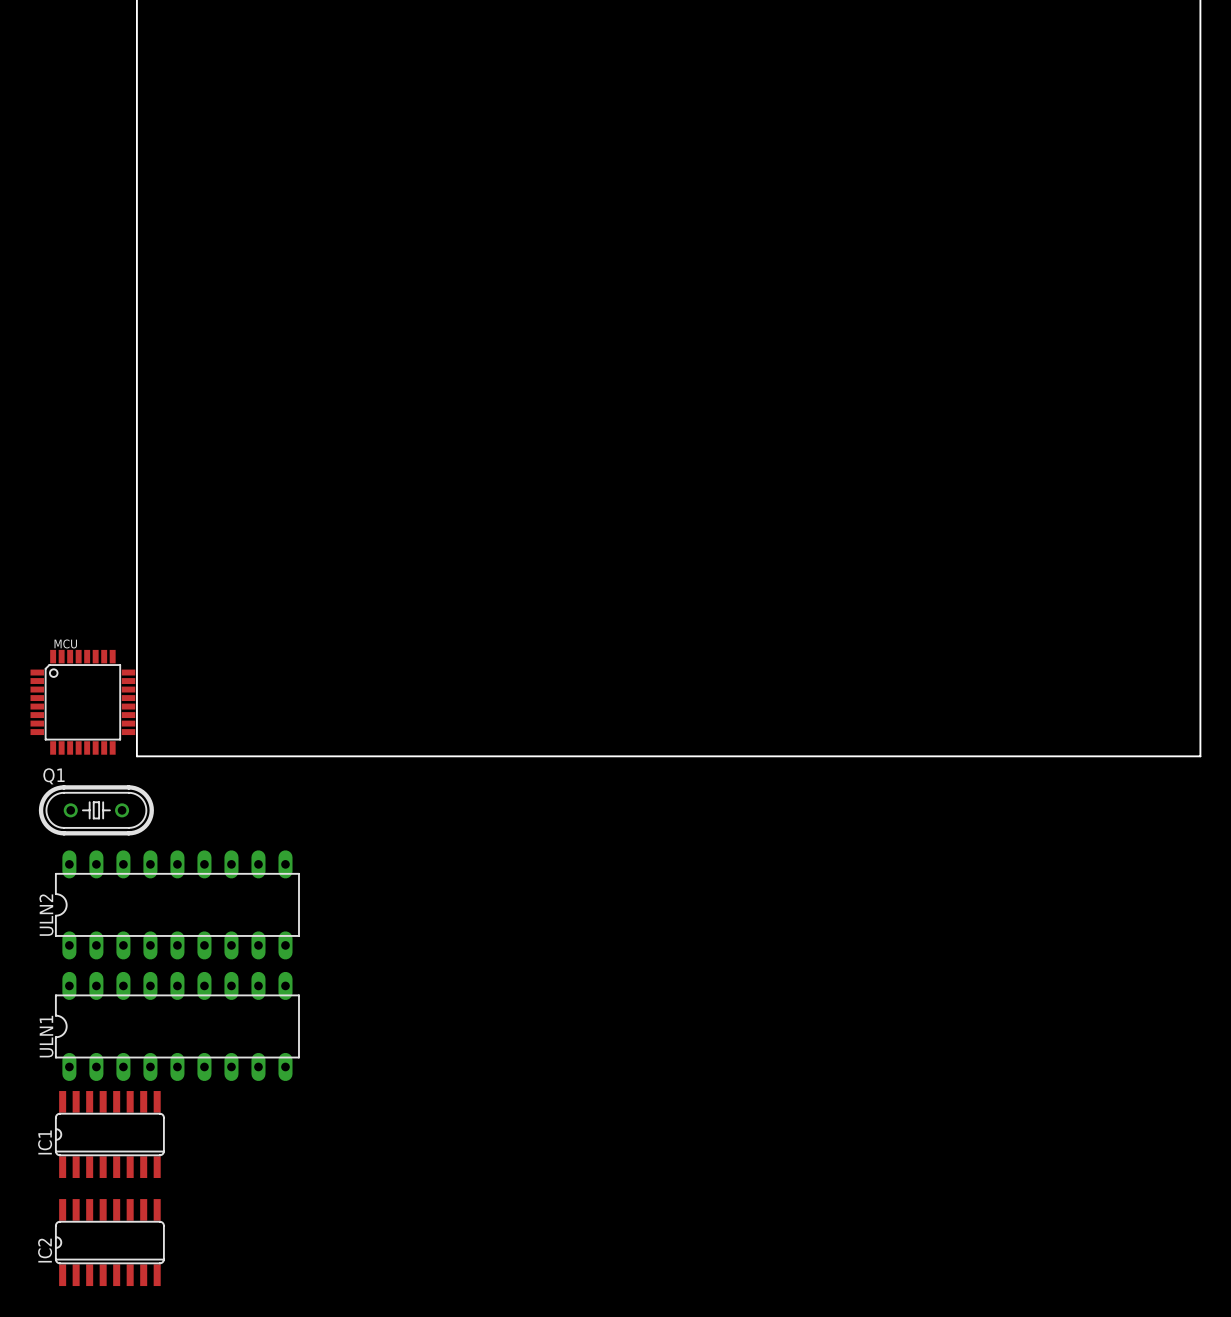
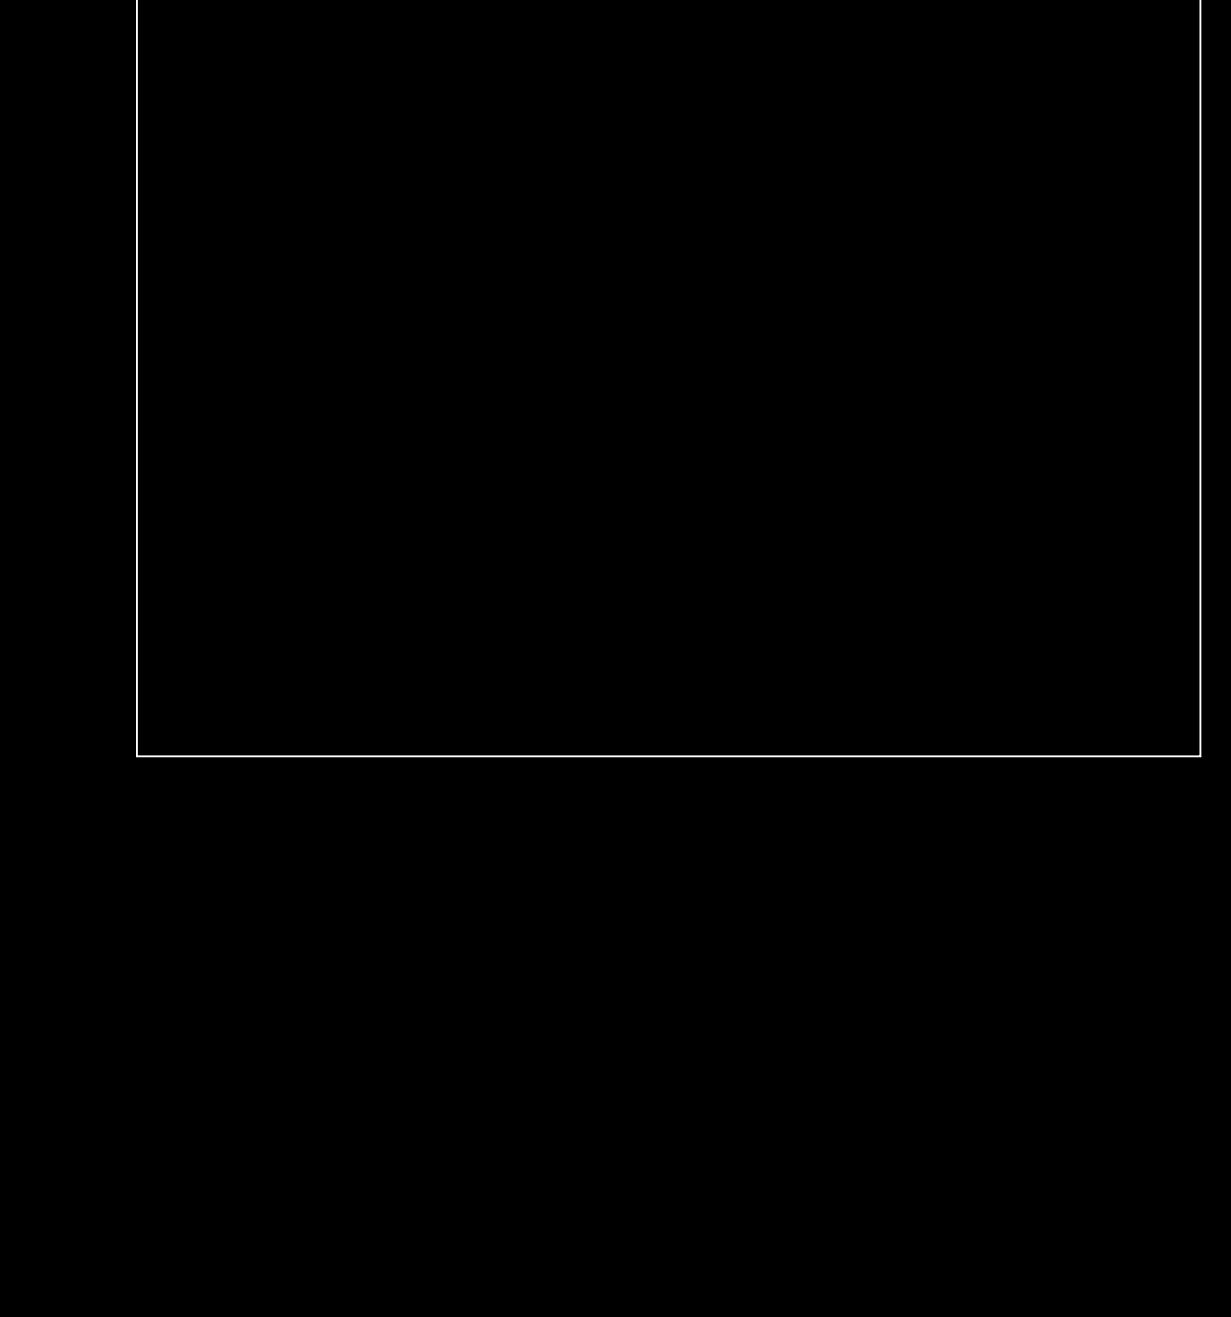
MCU: (82, 702) -> none
Q1: (96, 810) -> none
ULN2: (177, 904) -> none
ULN1: (177, 1026) -> none
IC1: (109, 1134) -> none
IC2: (109, 1242) -> none

